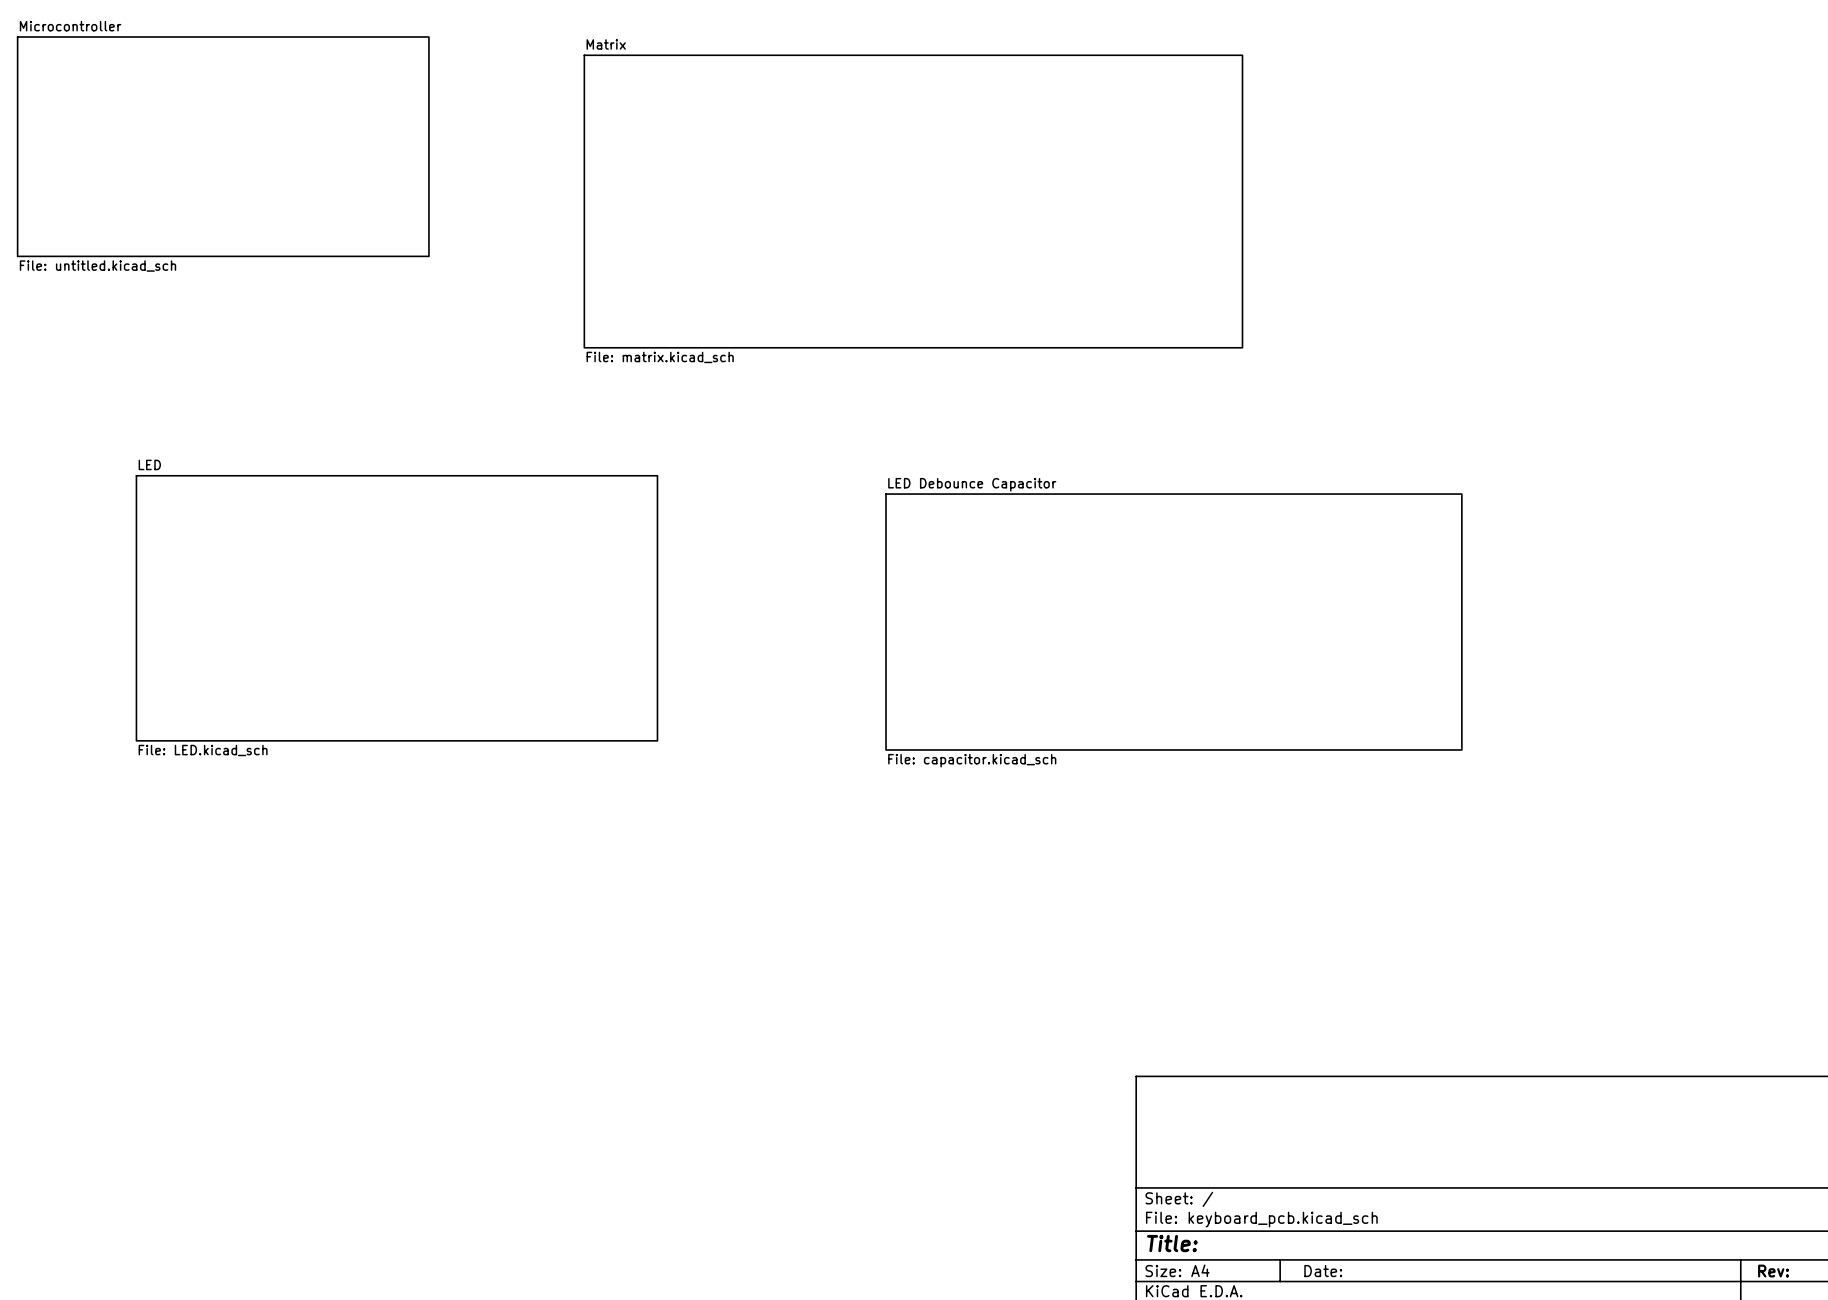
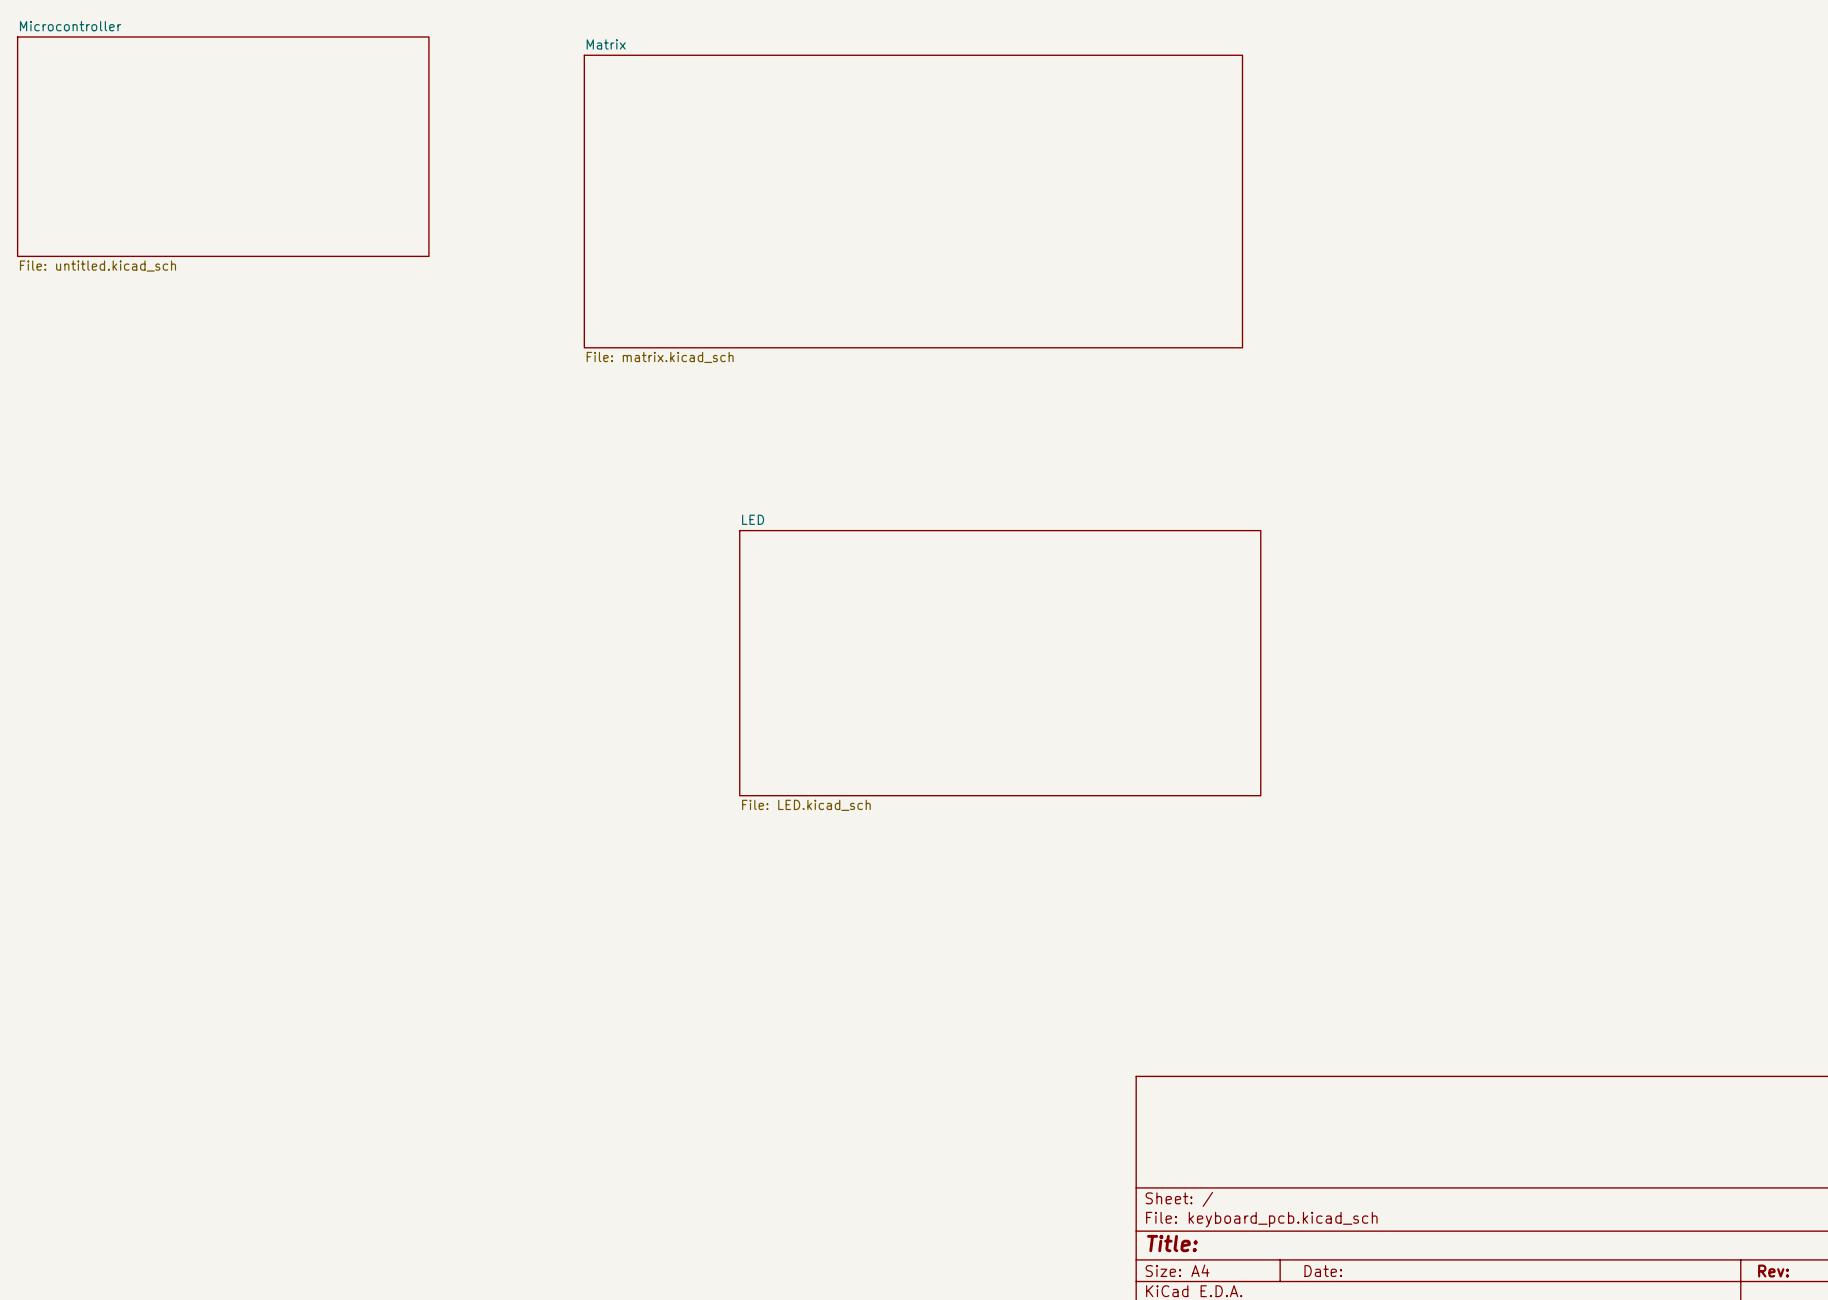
sheet LED: File: LED.kicad_sch (396, 608) -> none
sheet LED Debounce Capacitor: File: capacitor.kicad_sch (1173, 622) -> none
sheet LED: none -> File: LED.kicad_sch (1000, 663)

